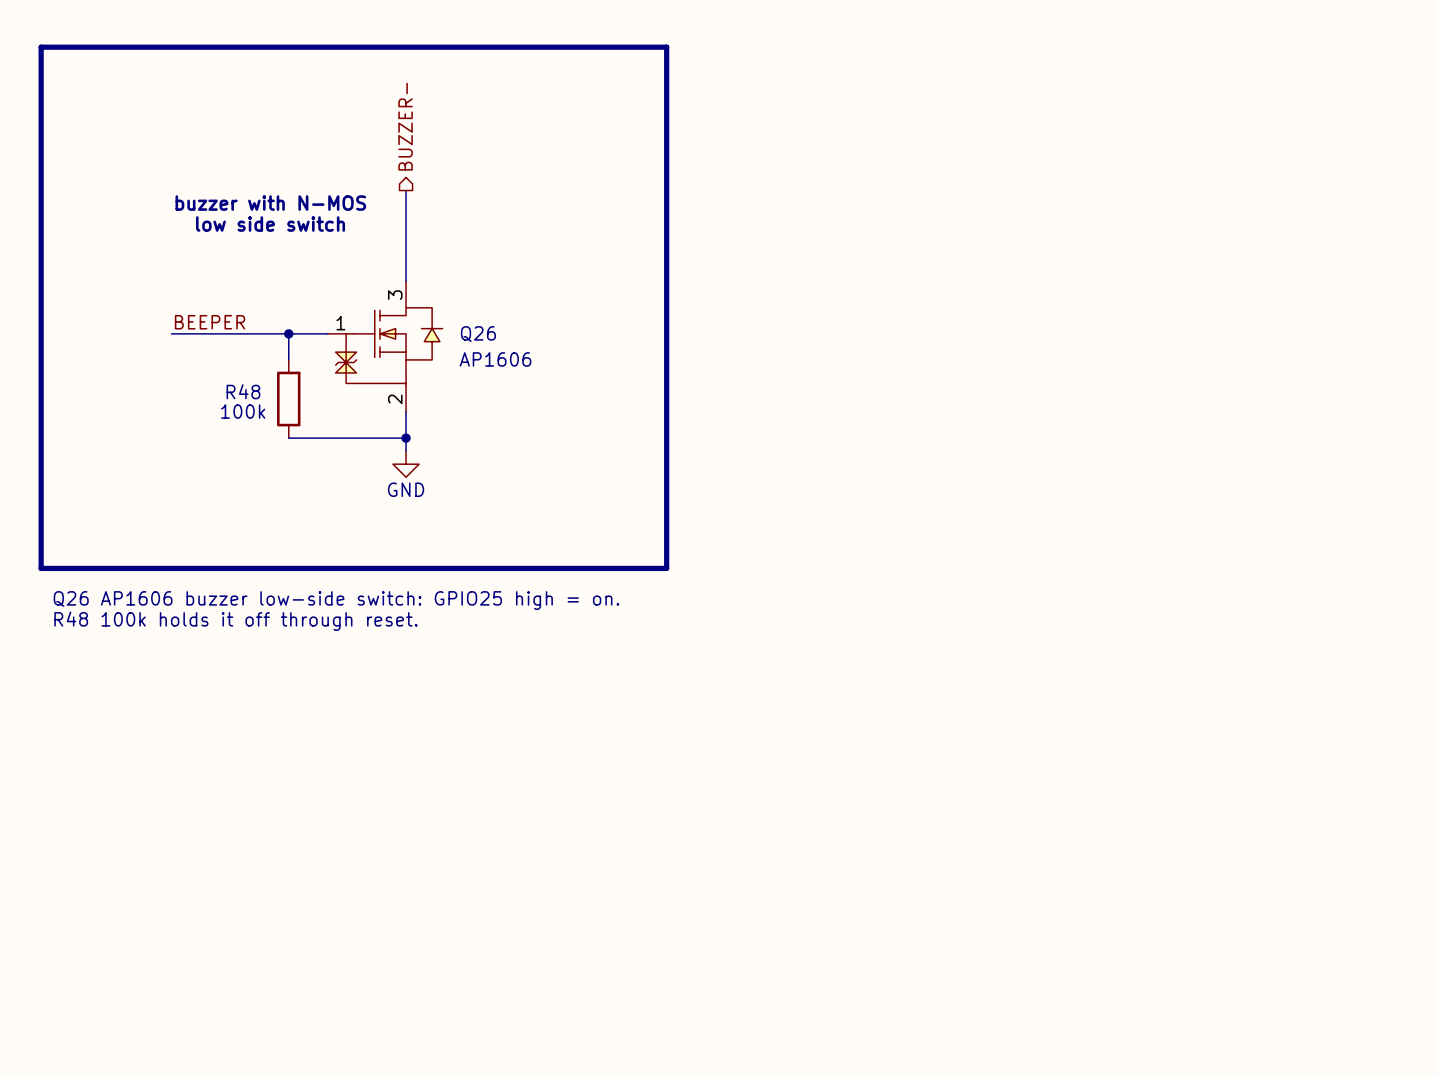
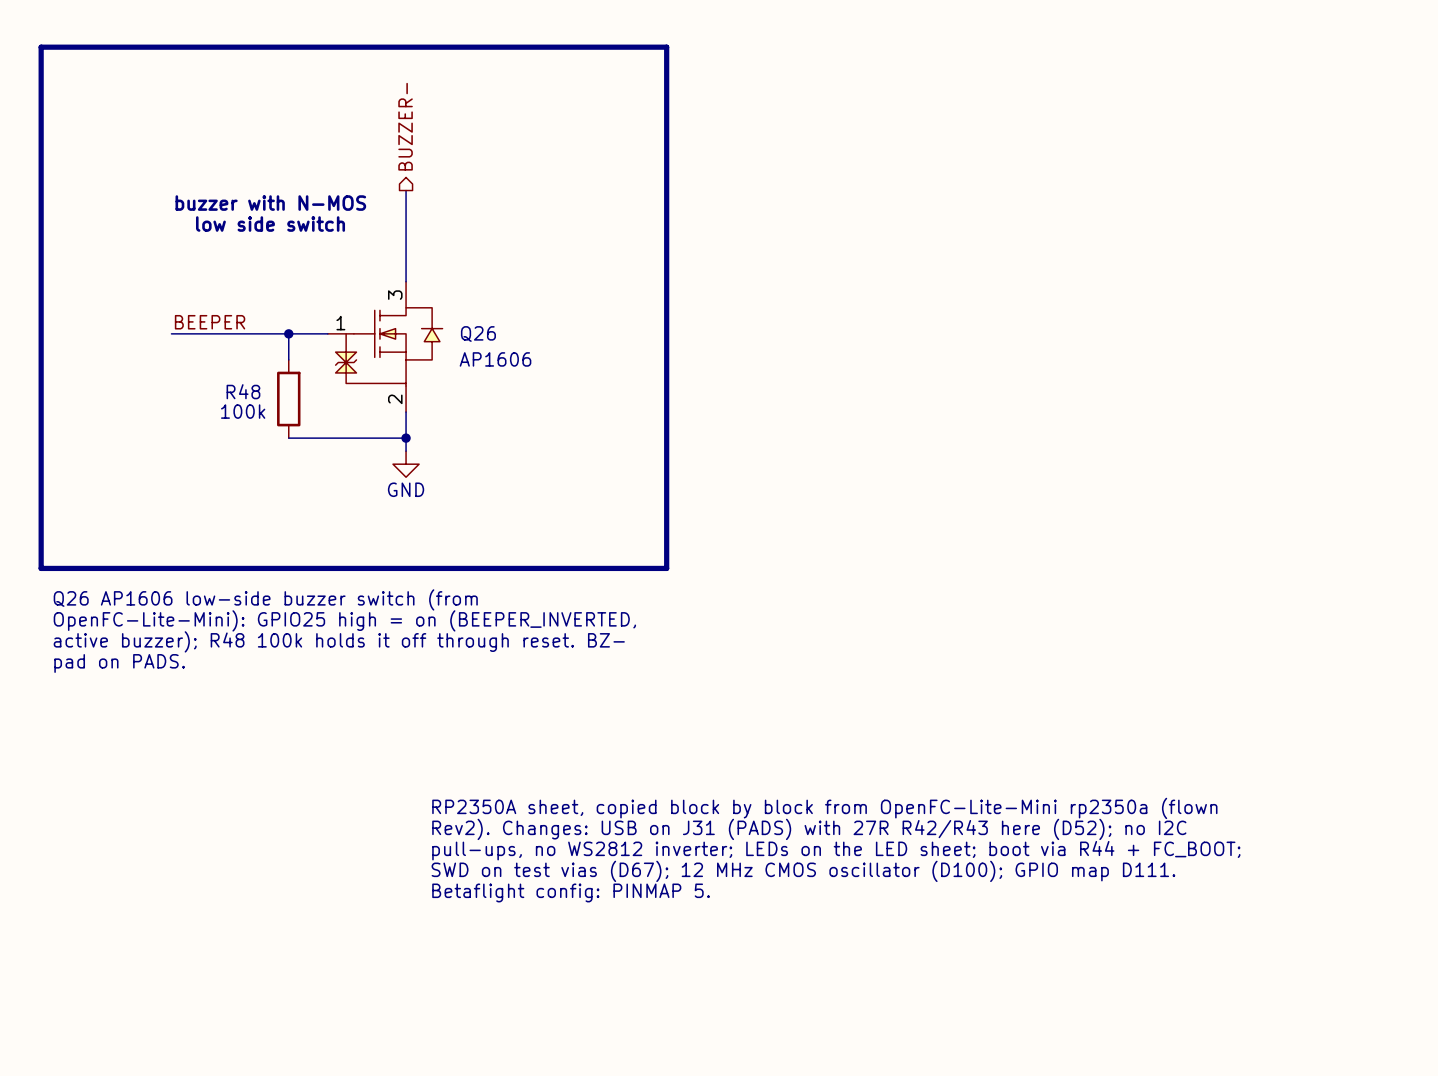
text: Q26 AP1606 buzzer low-side switch: GPIO25 high = on. (336, 600) -> Q26 AP1606 low-side buzzer switch (from (265, 599)
text: R48 100k holds it off through reset. (235, 621) -> OpenFC-Lite-Mini): GPIO25 high = on (BEEPER_INVERTED, (344, 620)
text: none -> active buzzer); R48 100k holds it off through reset. BZ- (339, 641)
text: none -> pad on PADS. (119, 663)
text: none -> RP2350A sheet, copied block by block from OpenFC-Lite-Mini rp2350a (flown (824, 808)
text: none -> Rev2). Changes: USB on J31 (PADS) with 27R R42/R43 here (D52); no I2C (809, 829)
text: none -> pull-ups, no WS2812 inverter; LEDs on the LED sheet; boot via R44 + FC_BOOT; (836, 850)
text: none -> SWD on test vias (D67); 12 MHz CMOS oscillator (D100); GPIO map D111. (803, 871)
text: none -> Betaflight config: PINMAP 5. (571, 892)

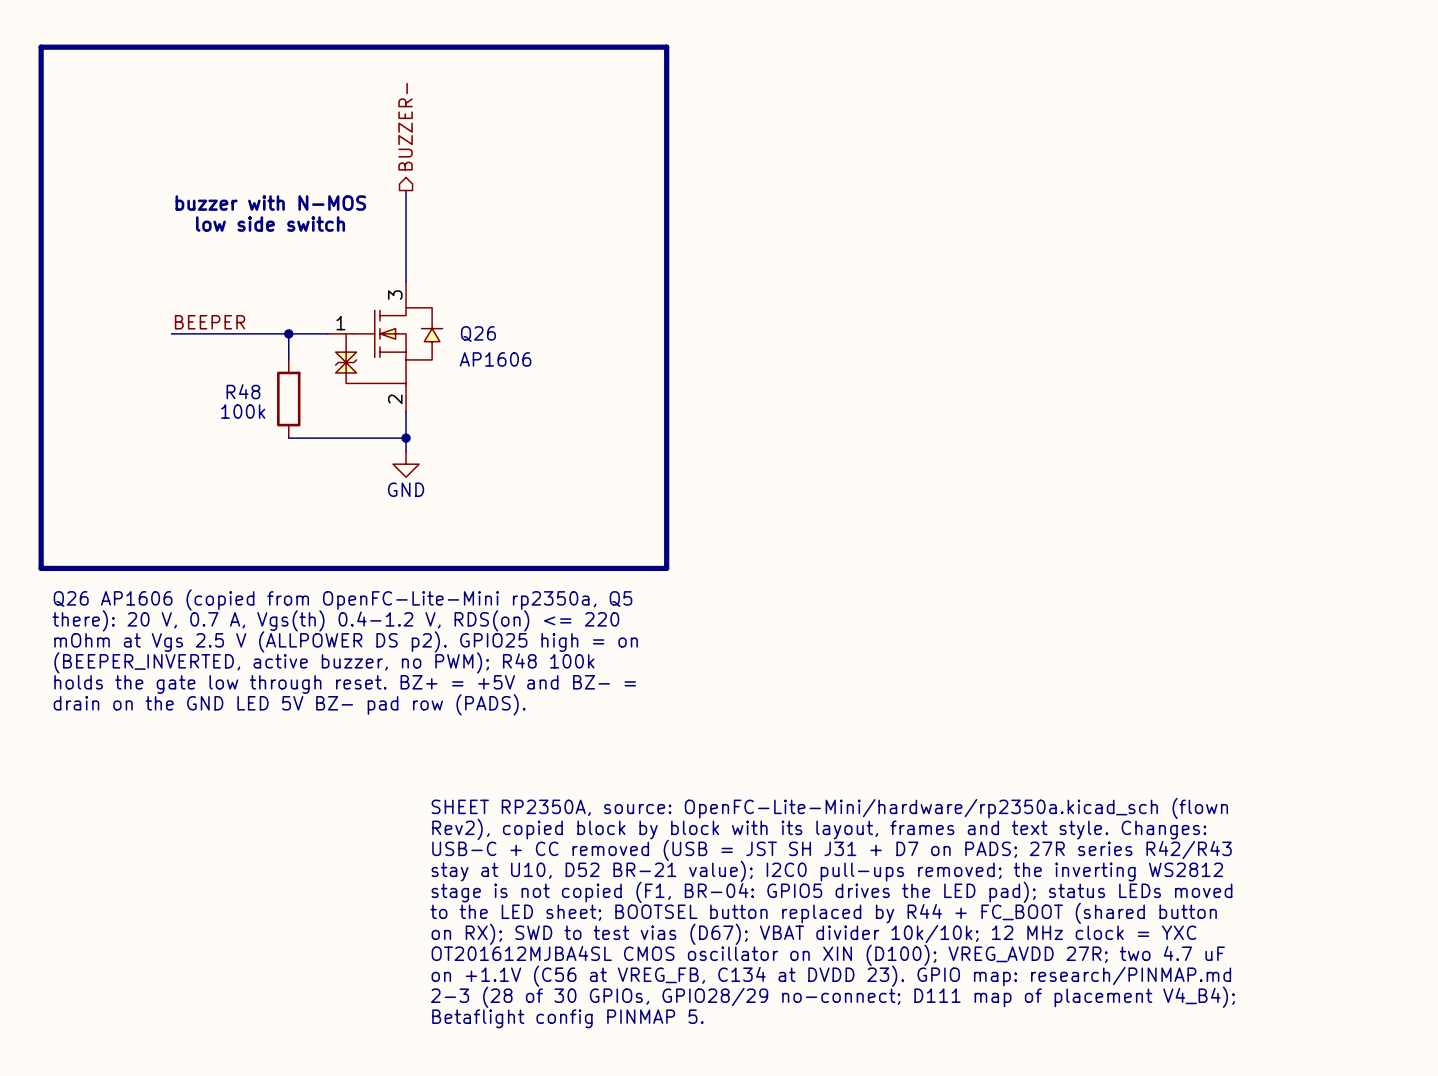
text: Q26 AP1606 low-side buzzer switch (from (265, 599) -> Q26 AP1606 (copied from OpenFC-Lite-Mini rp2350a, Q5 (343, 599)
text: OpenFC-Lite-Mini): GPIO25 high = on (BEEPER_INVERTED, (344, 620) -> there): 20 V, 0.7 A, Vgs(th) 0.4-1.2 V, RDS(on) <= 220 (335, 620)
text: active buzzer); R48 100k holds it off through reset. BZ- (339, 641) -> mOhm at Vgs 2.5 V (ALLPOWER DS p2). GPIO25 high = on (346, 641)
text: pad on PADS. (119, 663) -> (BEEPER_INVERTED, active buzzer, no PWM); R48 100k (324, 662)
text: none -> holds the gate low through reset. BZ+ = +5V and BZ- = (345, 684)
text: none -> drain on the GND LED 5V BZ- pad row (PADS). (289, 704)
text: RP2350A sheet, copied block by block from OpenFC-Lite-Mini rp2350a (flown (824, 808) -> SHEET RP2350A, source: OpenFC-Lite-Mini/hardware/rp2350a.kicad_sch (flown (829, 808)
text: Rev2). Changes: USB on J31 (PADS) with 27R R42/R43 here (D52); no I2C (809, 829) -> Rev2), copied block by block with its layout, frames and text style. Changes: (819, 829)
text: pull-ups, no WS2812 inverter; LEDs on the LED sheet; boot via R44 + FC_BOOT; (836, 850) -> USB-C + CC removed (USB = JST SH J31 + D7 on PADS; 27R series R42/R43 (831, 850)
text: SWD on test vias (D67); 12 MHz CMOS oscillator (D100); GPIO map D111. (803, 871) -> stay at U10, D52 BR-21 value); I2C0 pull-ups removed; the inverting WS2812 (827, 871)
text: Betaflight config: PINMAP 5. (571, 892) -> stage is not copied (F1, BR-04: GPIO5 drives the LED pad); status LEDs moved (831, 892)
text: none -> to the LED sheet; BOOTSEL button replaced by R44 + FC_BOOT (shared button (823, 913)
text: none -> on RX); SWD to test vias (D67); VBAT divider 10k/10k; 12 MHz clock = YXC (813, 934)
text: none -> OT201612MJBA4SL CMOS oscillator on XIN (D100); VREG_AVDD 27R; two 4.7 uF (828, 955)
text: none -> on +1.1V (C56 at VREG_FB, C134 at DVDD 23). GPIO map: research/PINMAP.md (831, 976)
text: none -> 2-3 (28 of 30 GPIOs, GPIO28/29 no-connect; D111 map of placement V4_B4); (832, 997)
text: none -> Betaflight config PINMAP 5. (567, 1018)

